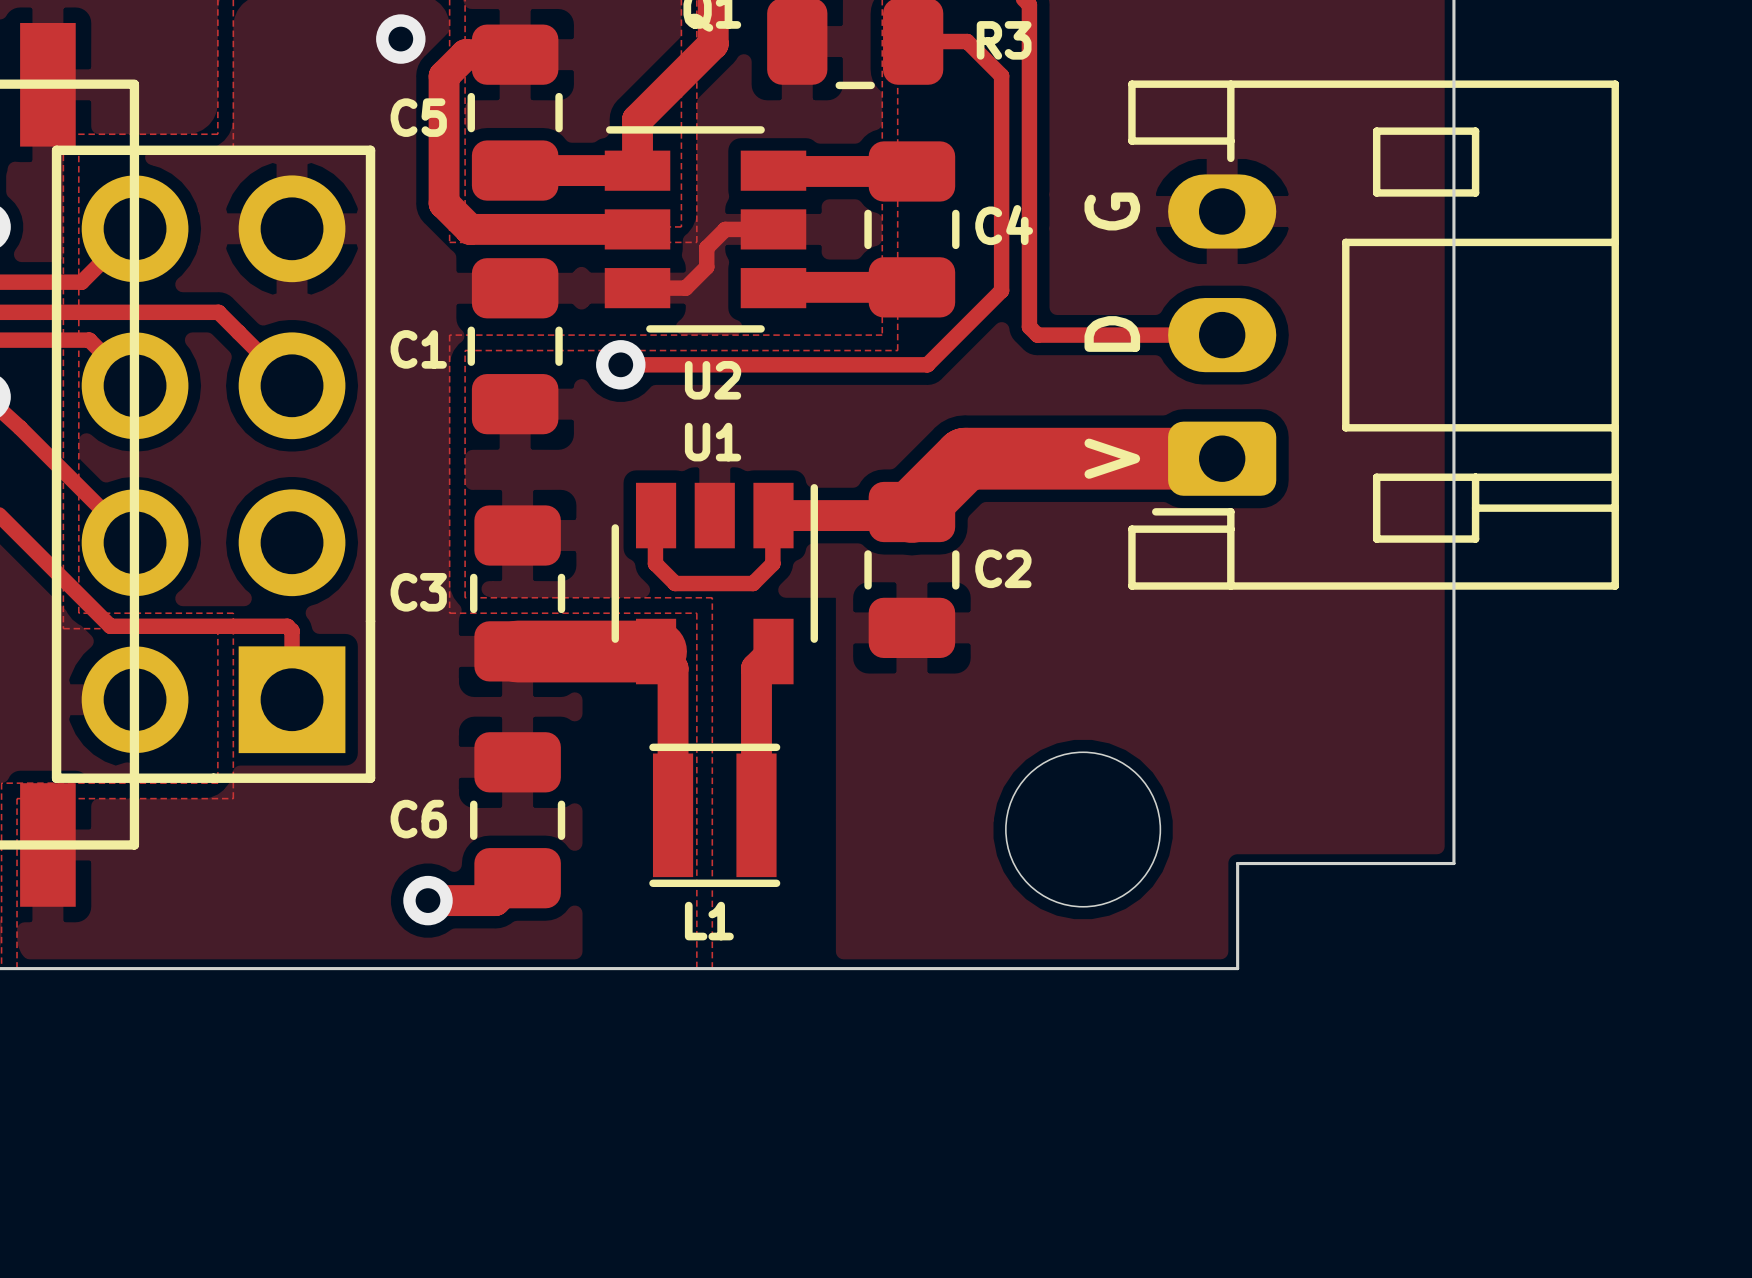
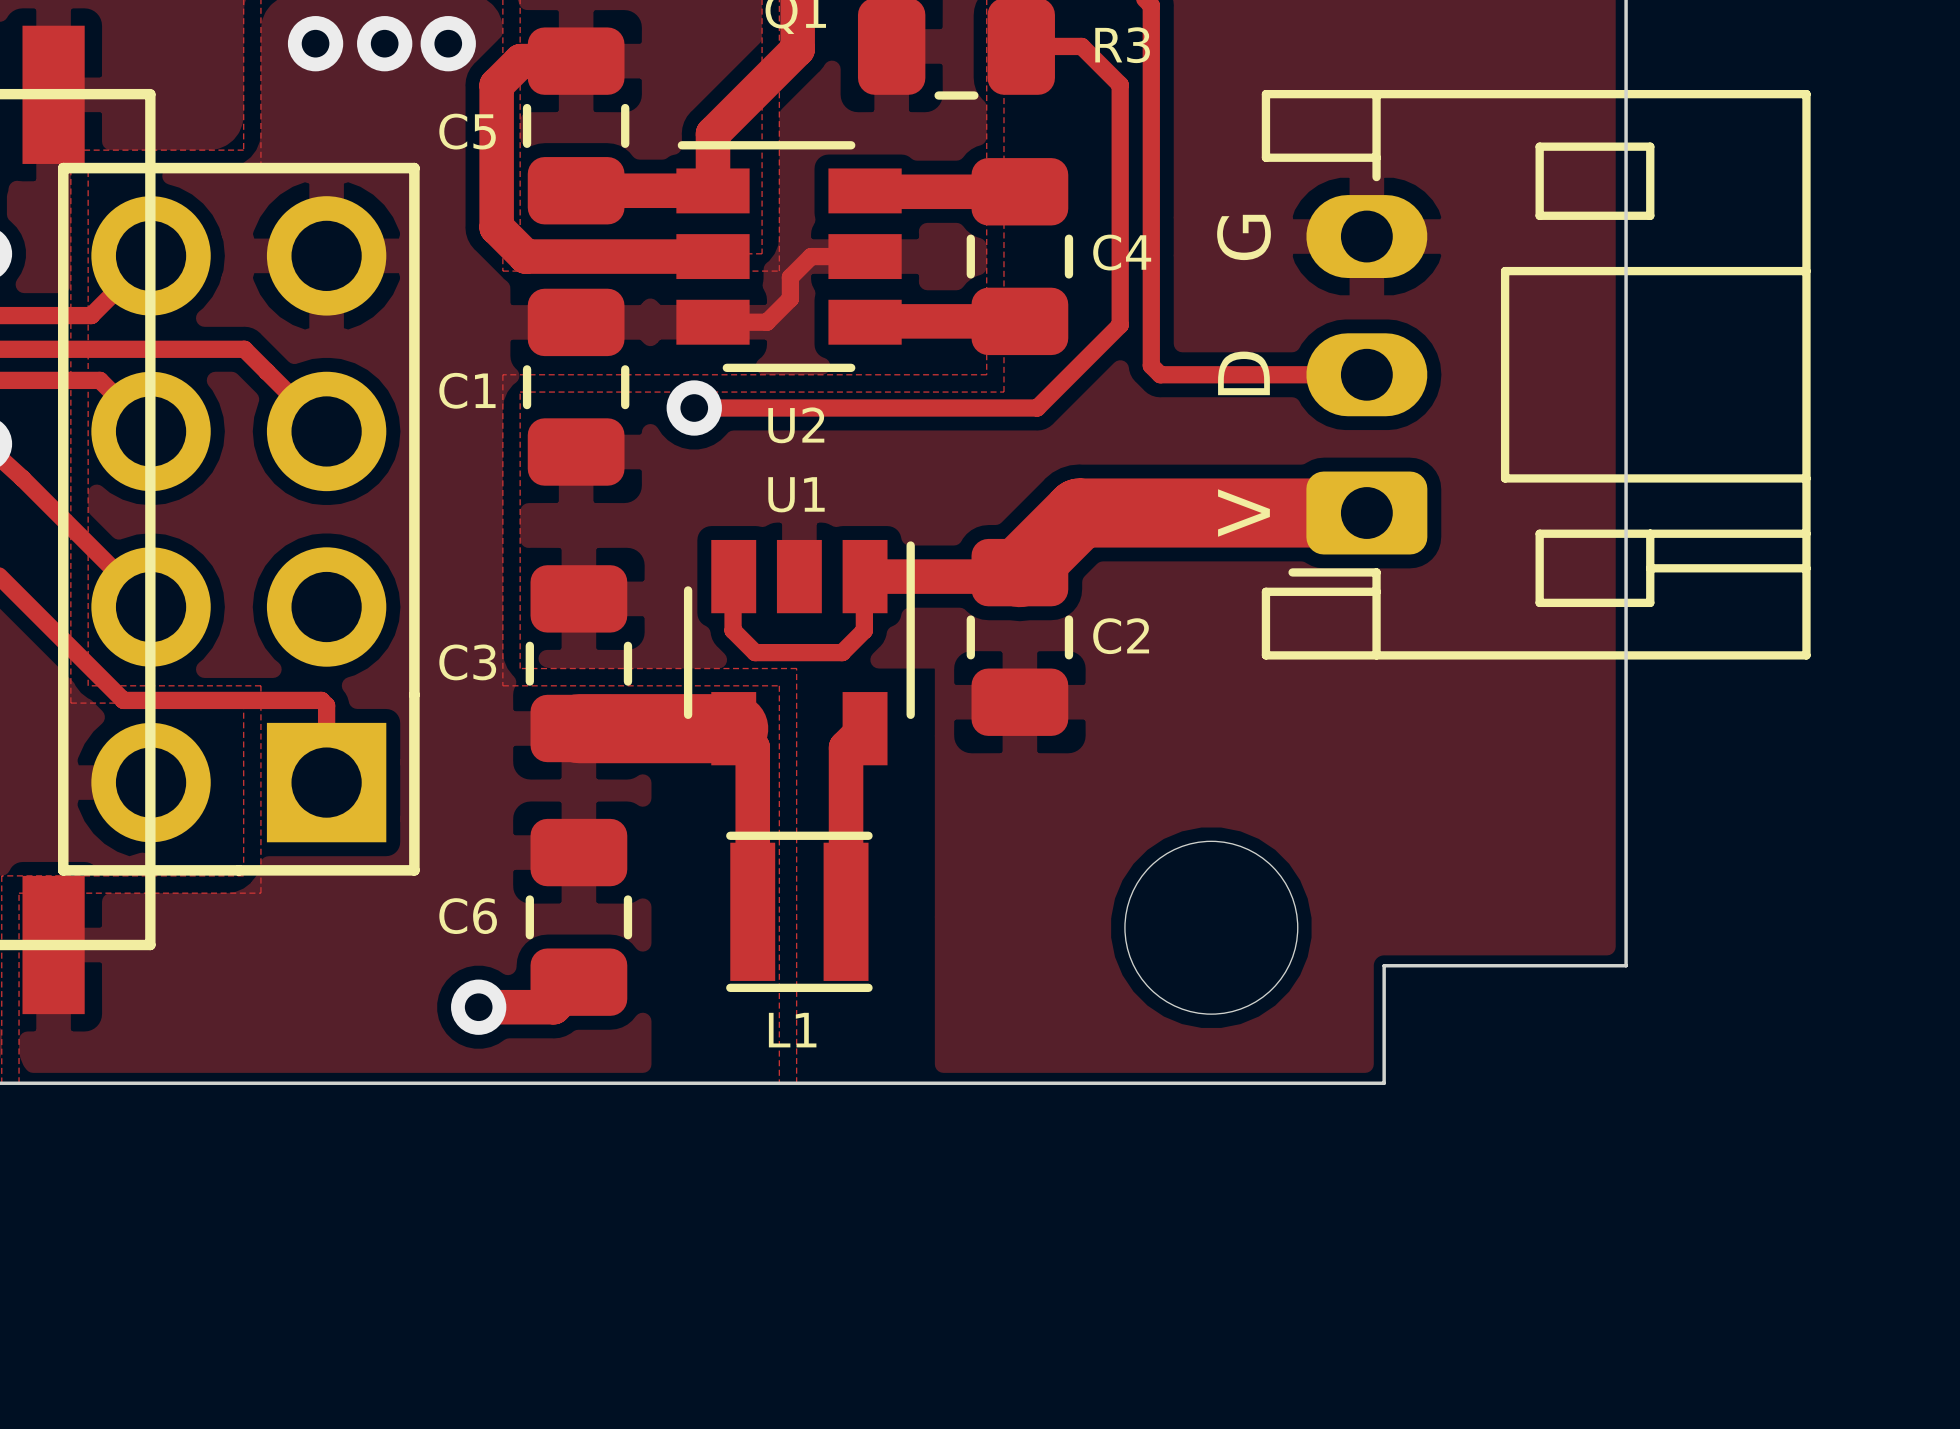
via: none -> (315, 43)
via: none -> (384, 43)

